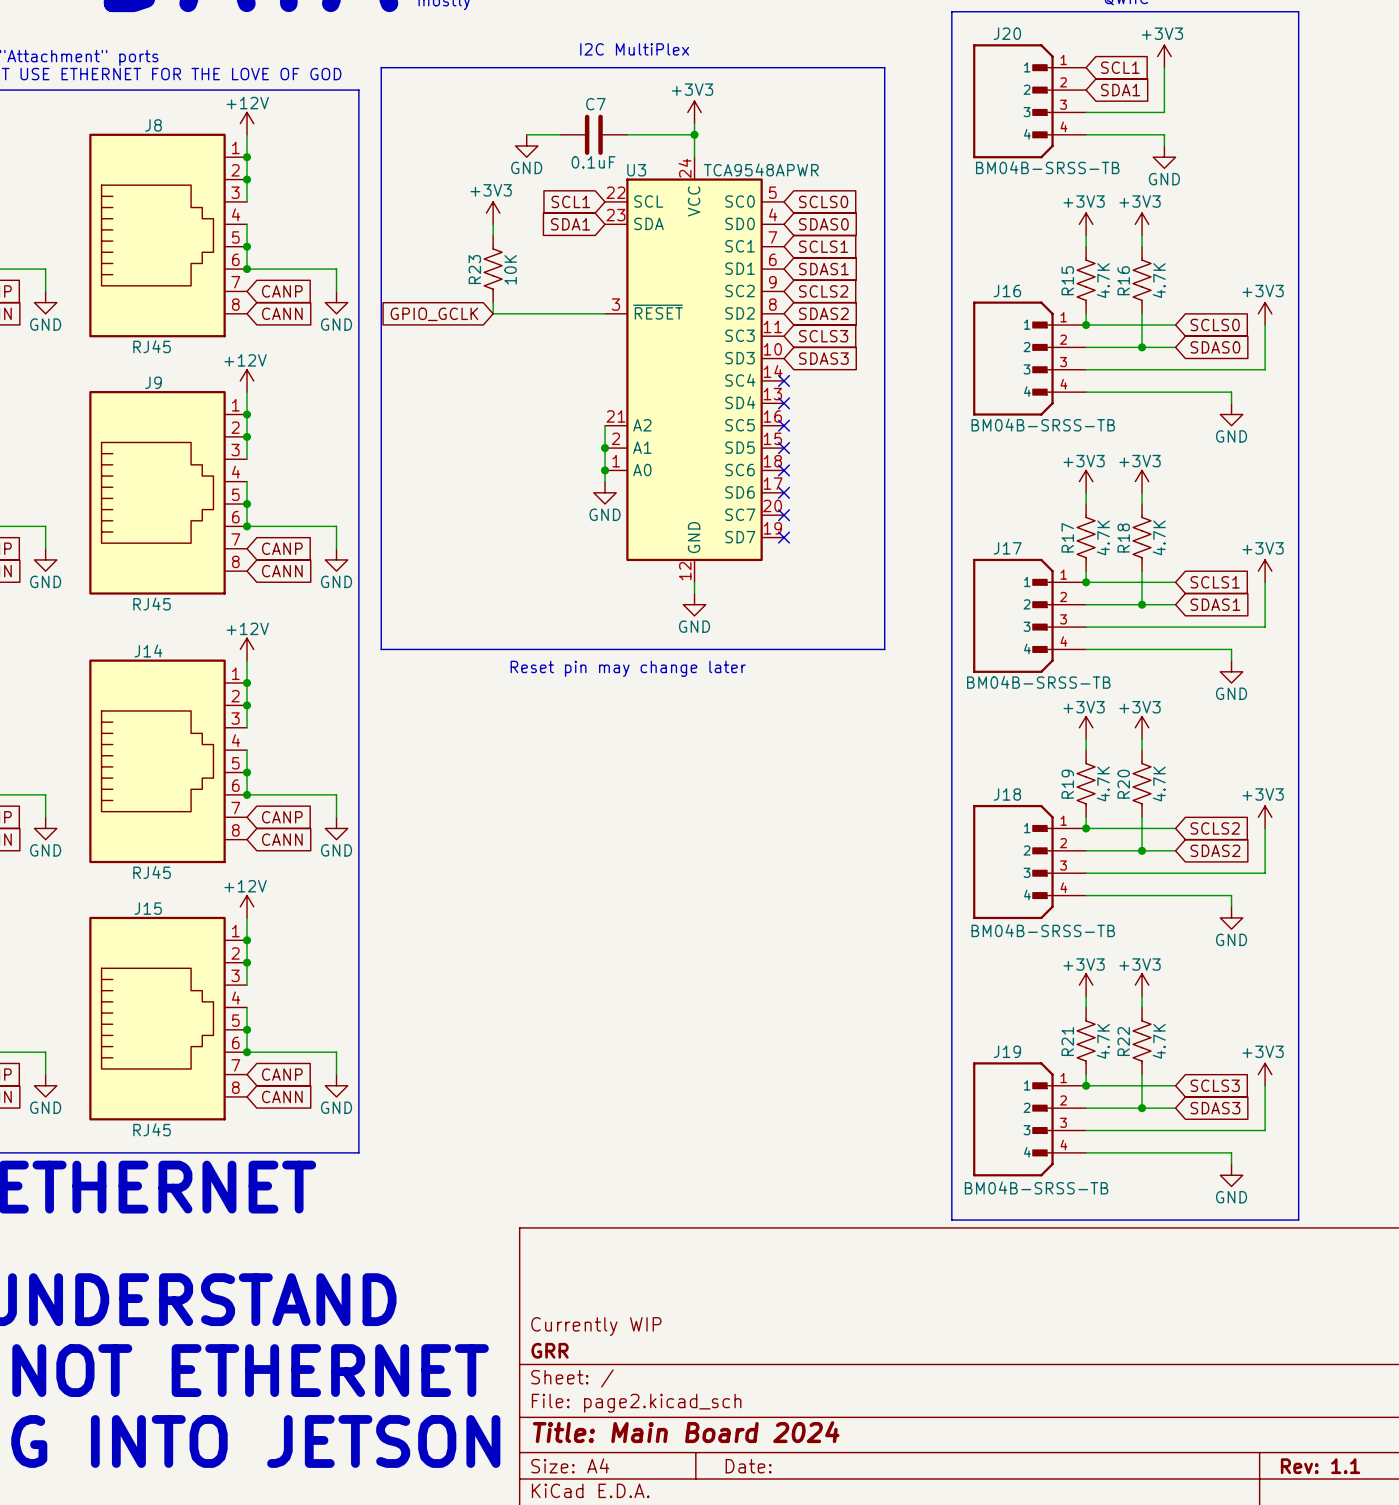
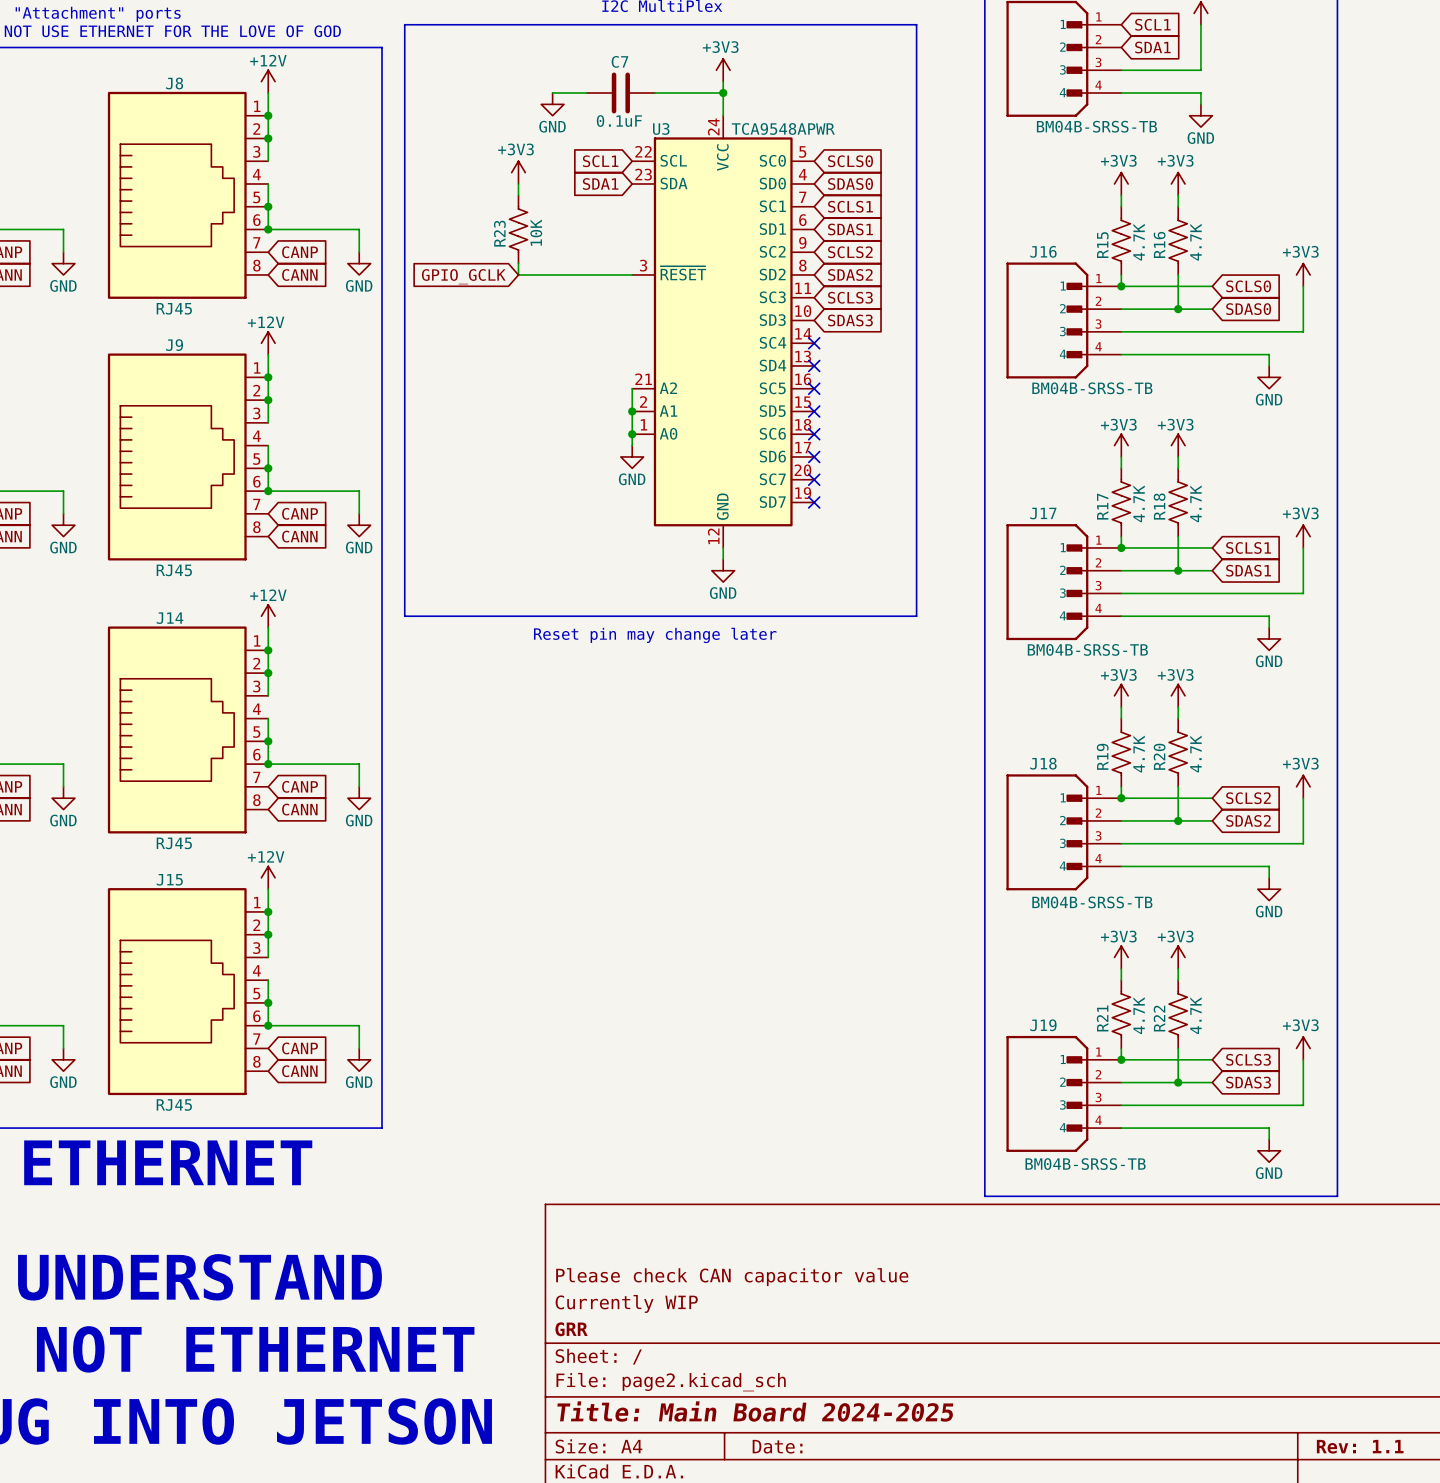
title block: none -> Please check CAN capacitor value (732, 1277)
title block: Title: Main Board 2024 (686, 1432) -> Title: Main Board 2024-2025 (755, 1411)

